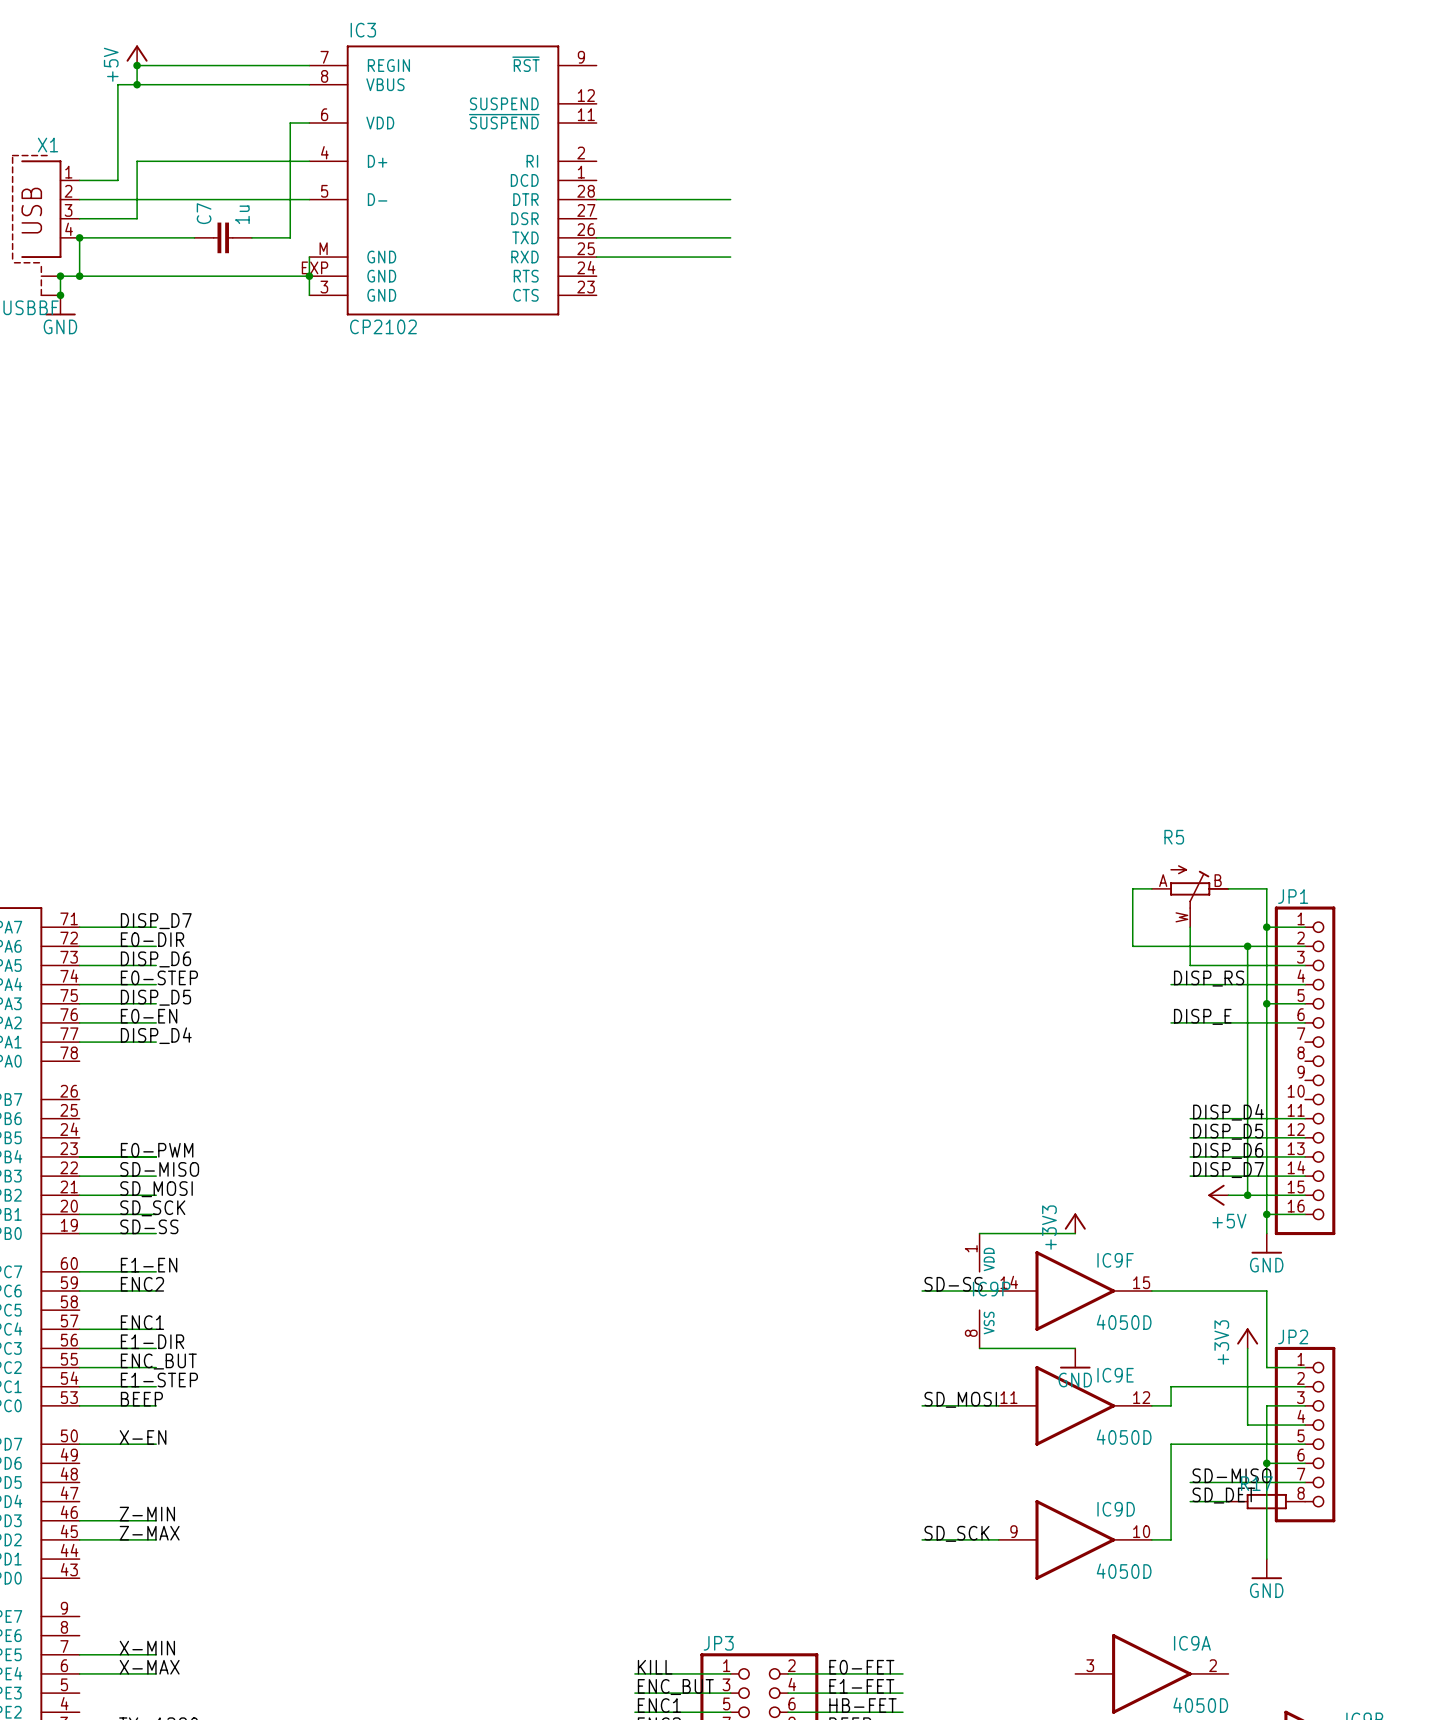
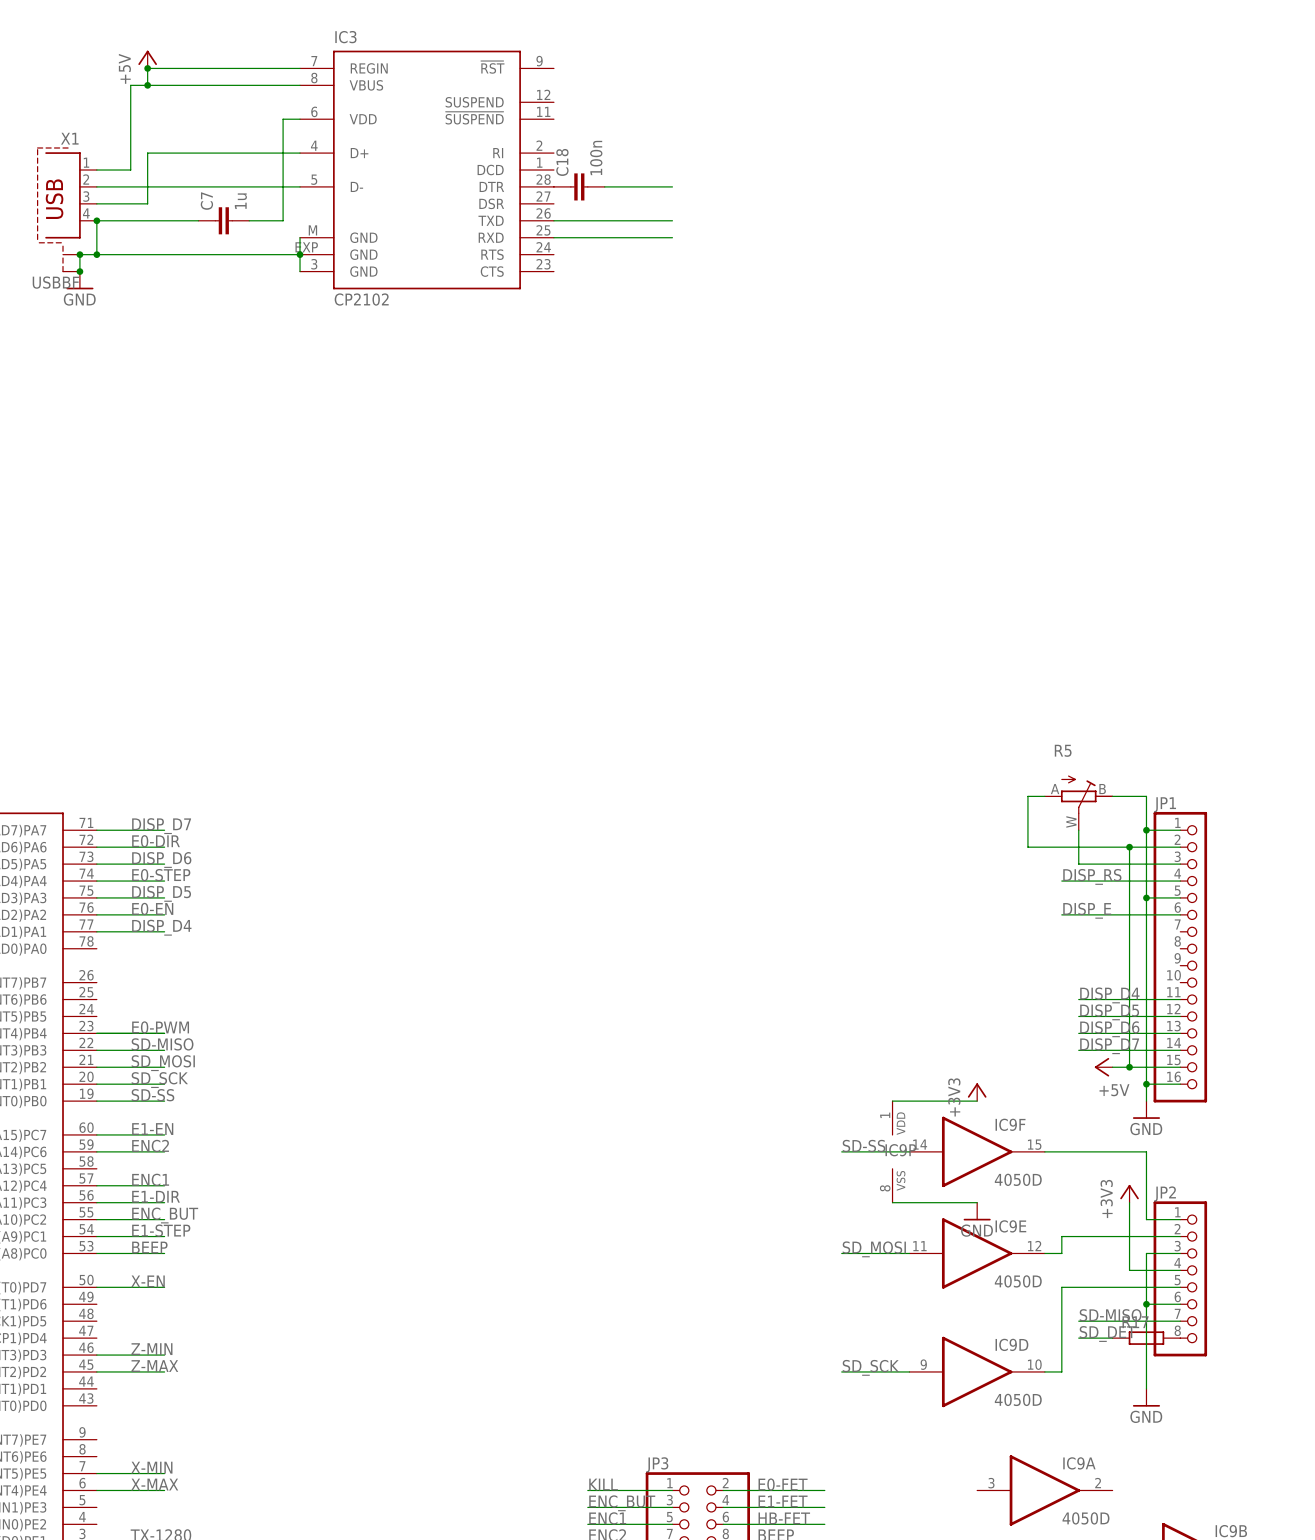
C18: none -> 100n (579, 186)

